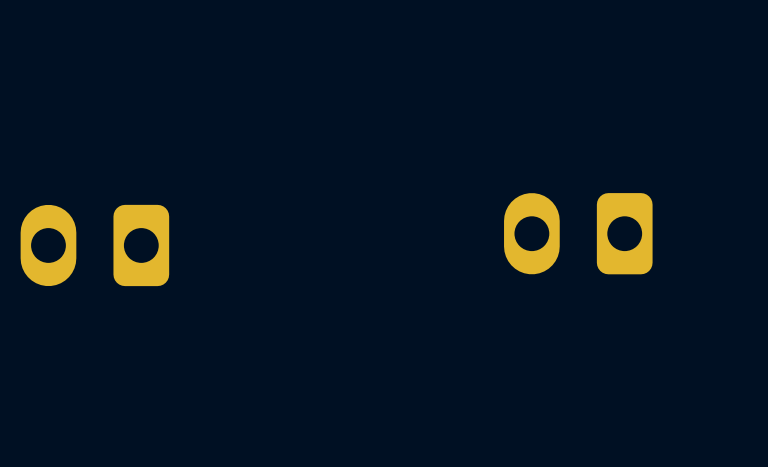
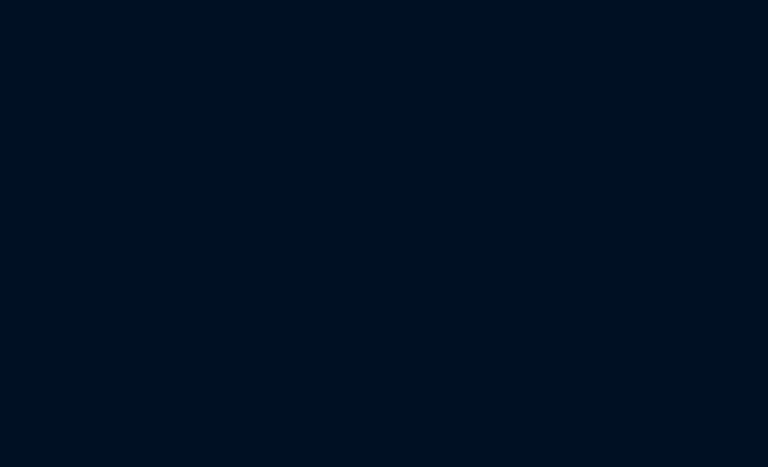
part: (578, 233) -> none
part: (94, 245) -> none

